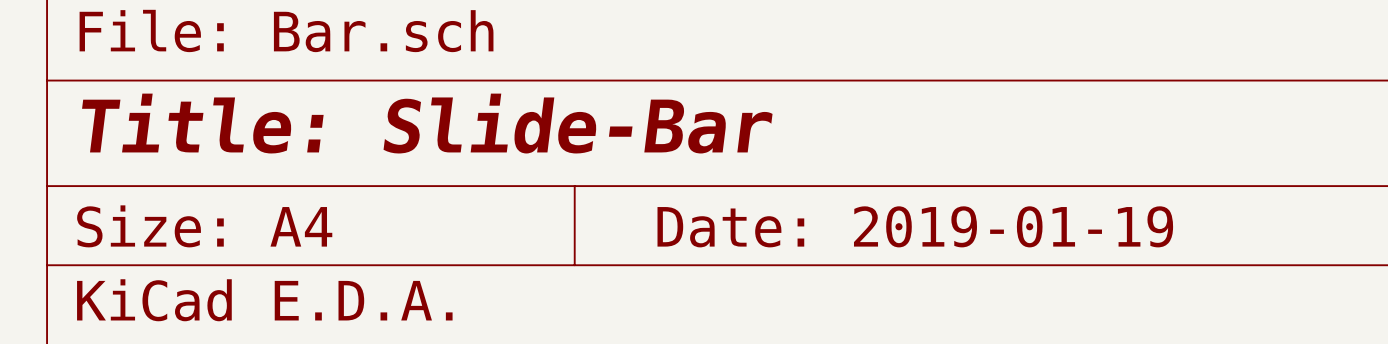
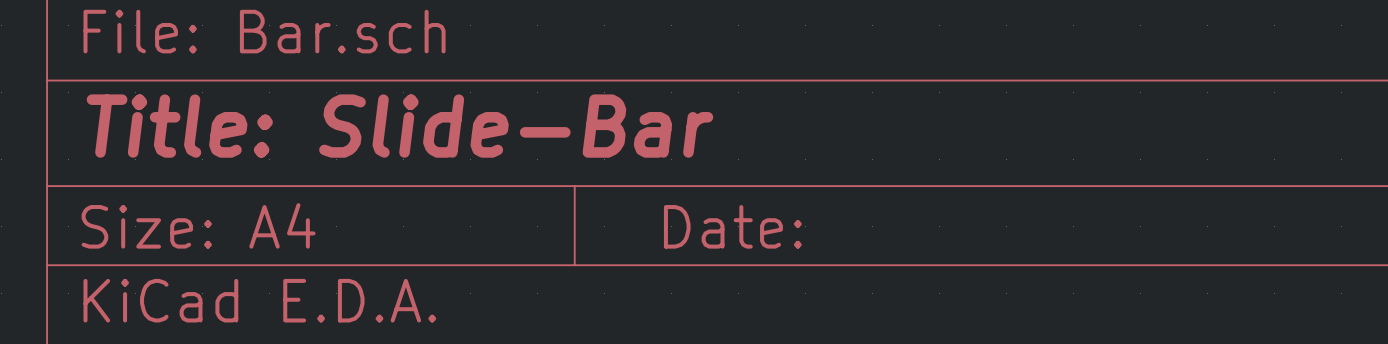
title block: Date: 2019-01-19 (915, 226) -> Date: (732, 226)

